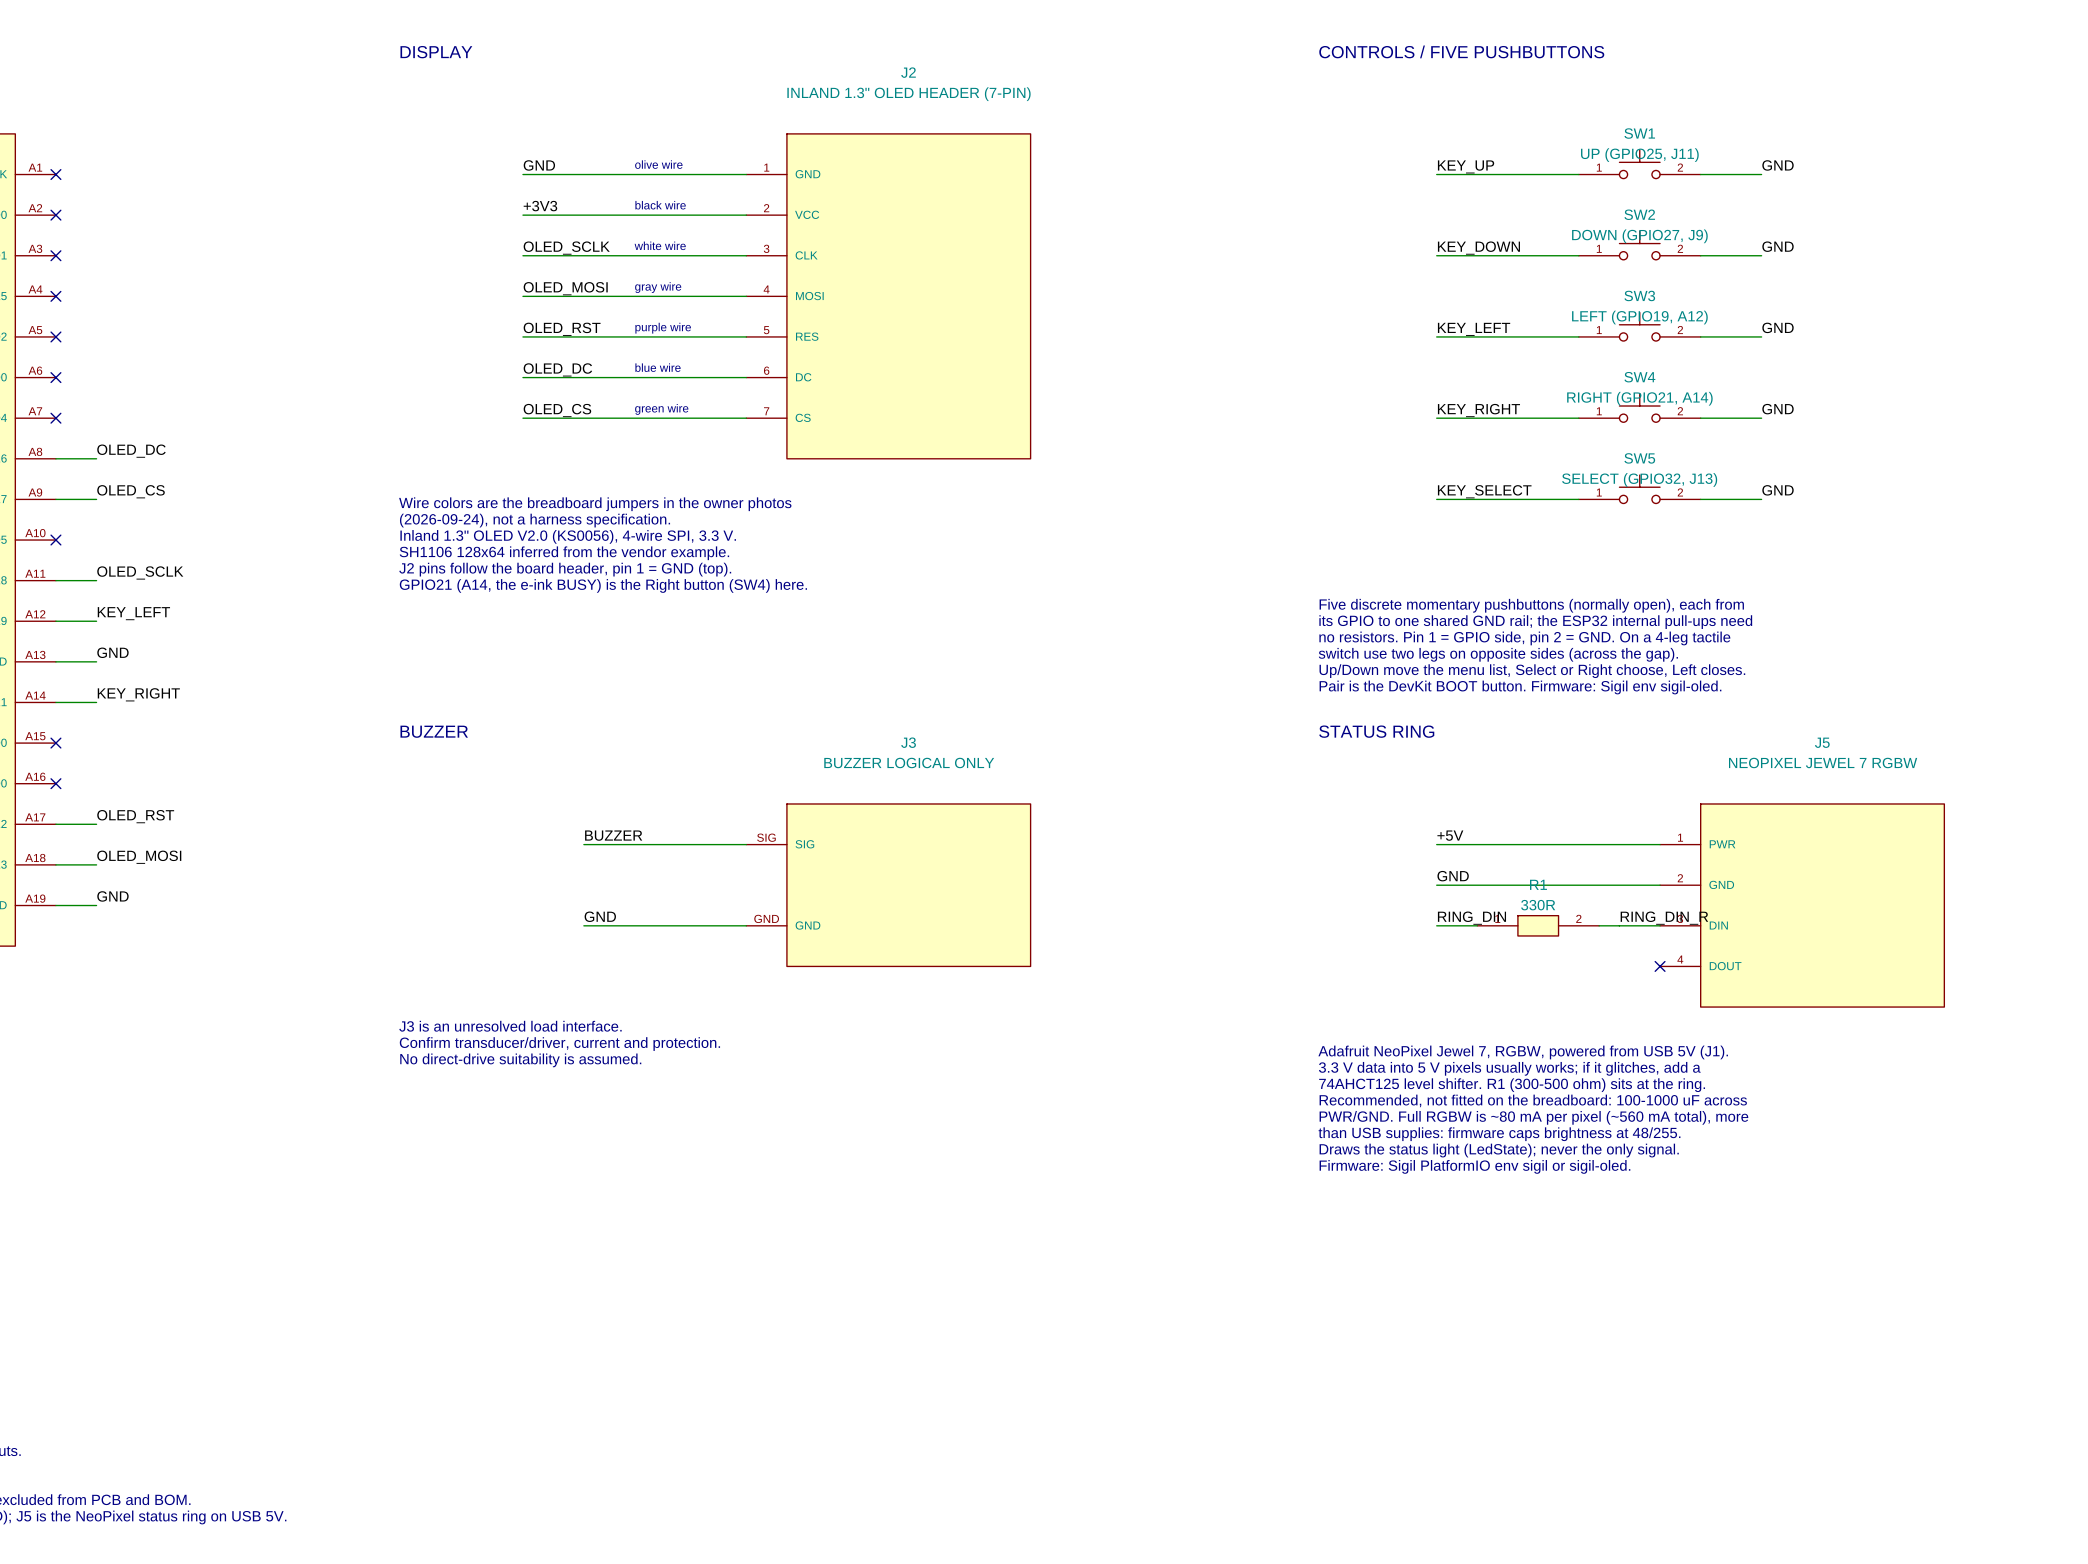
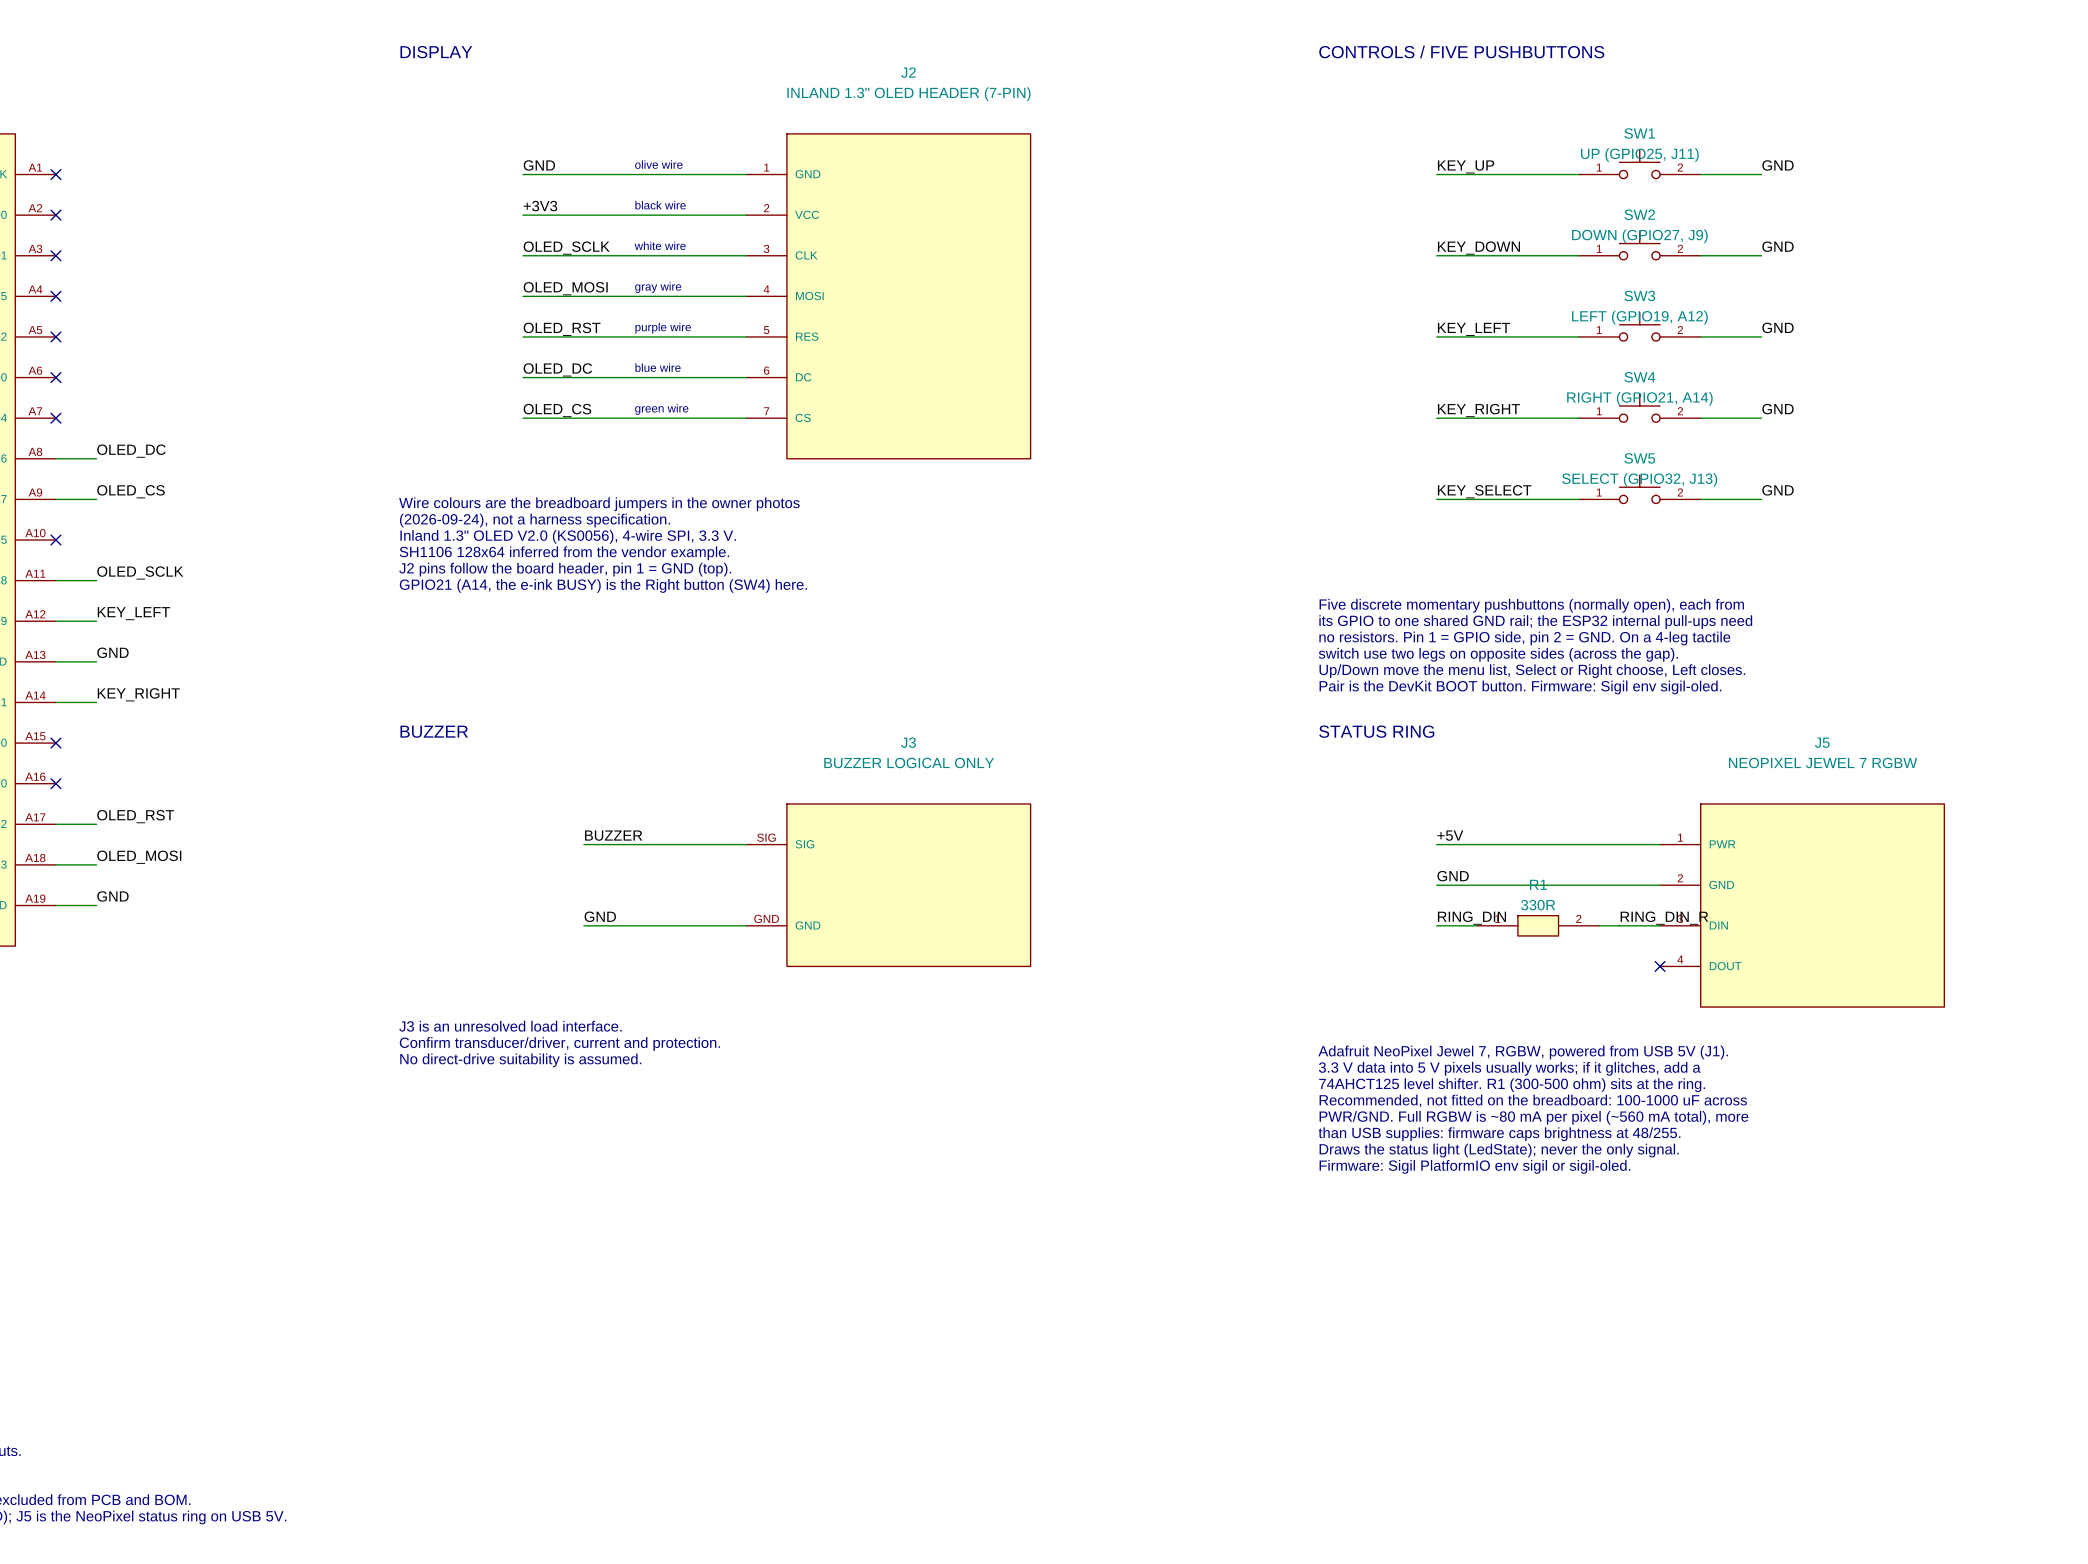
text: Wire colors are the breadboard jumpers in the owner photos (595, 504) -> Wire colours are the breadboard jumpers in the owner photos (599, 504)

